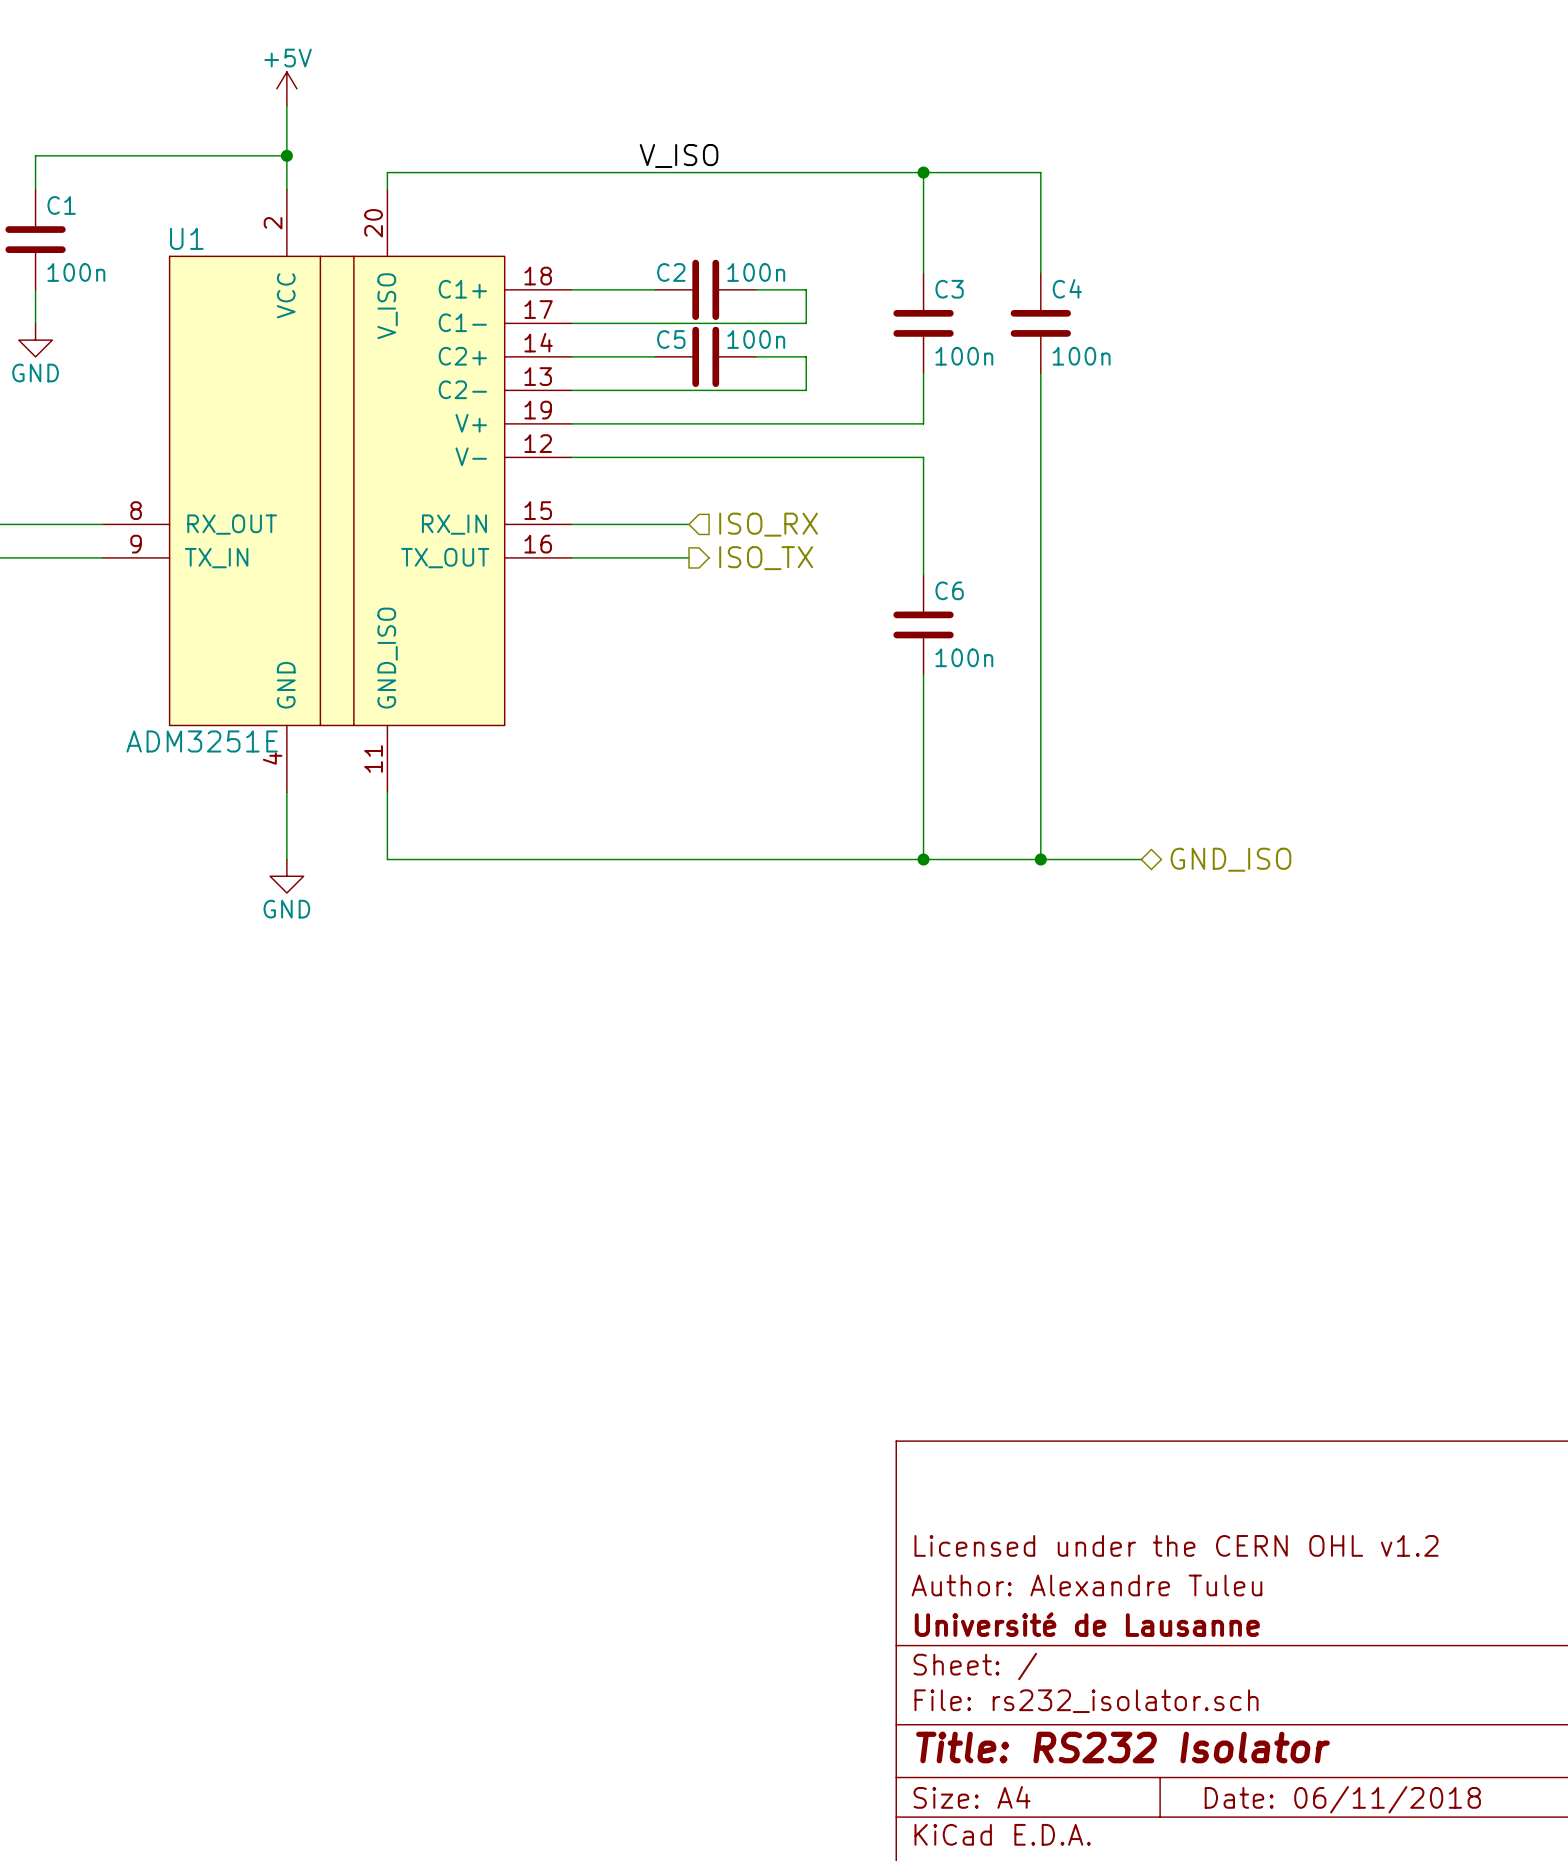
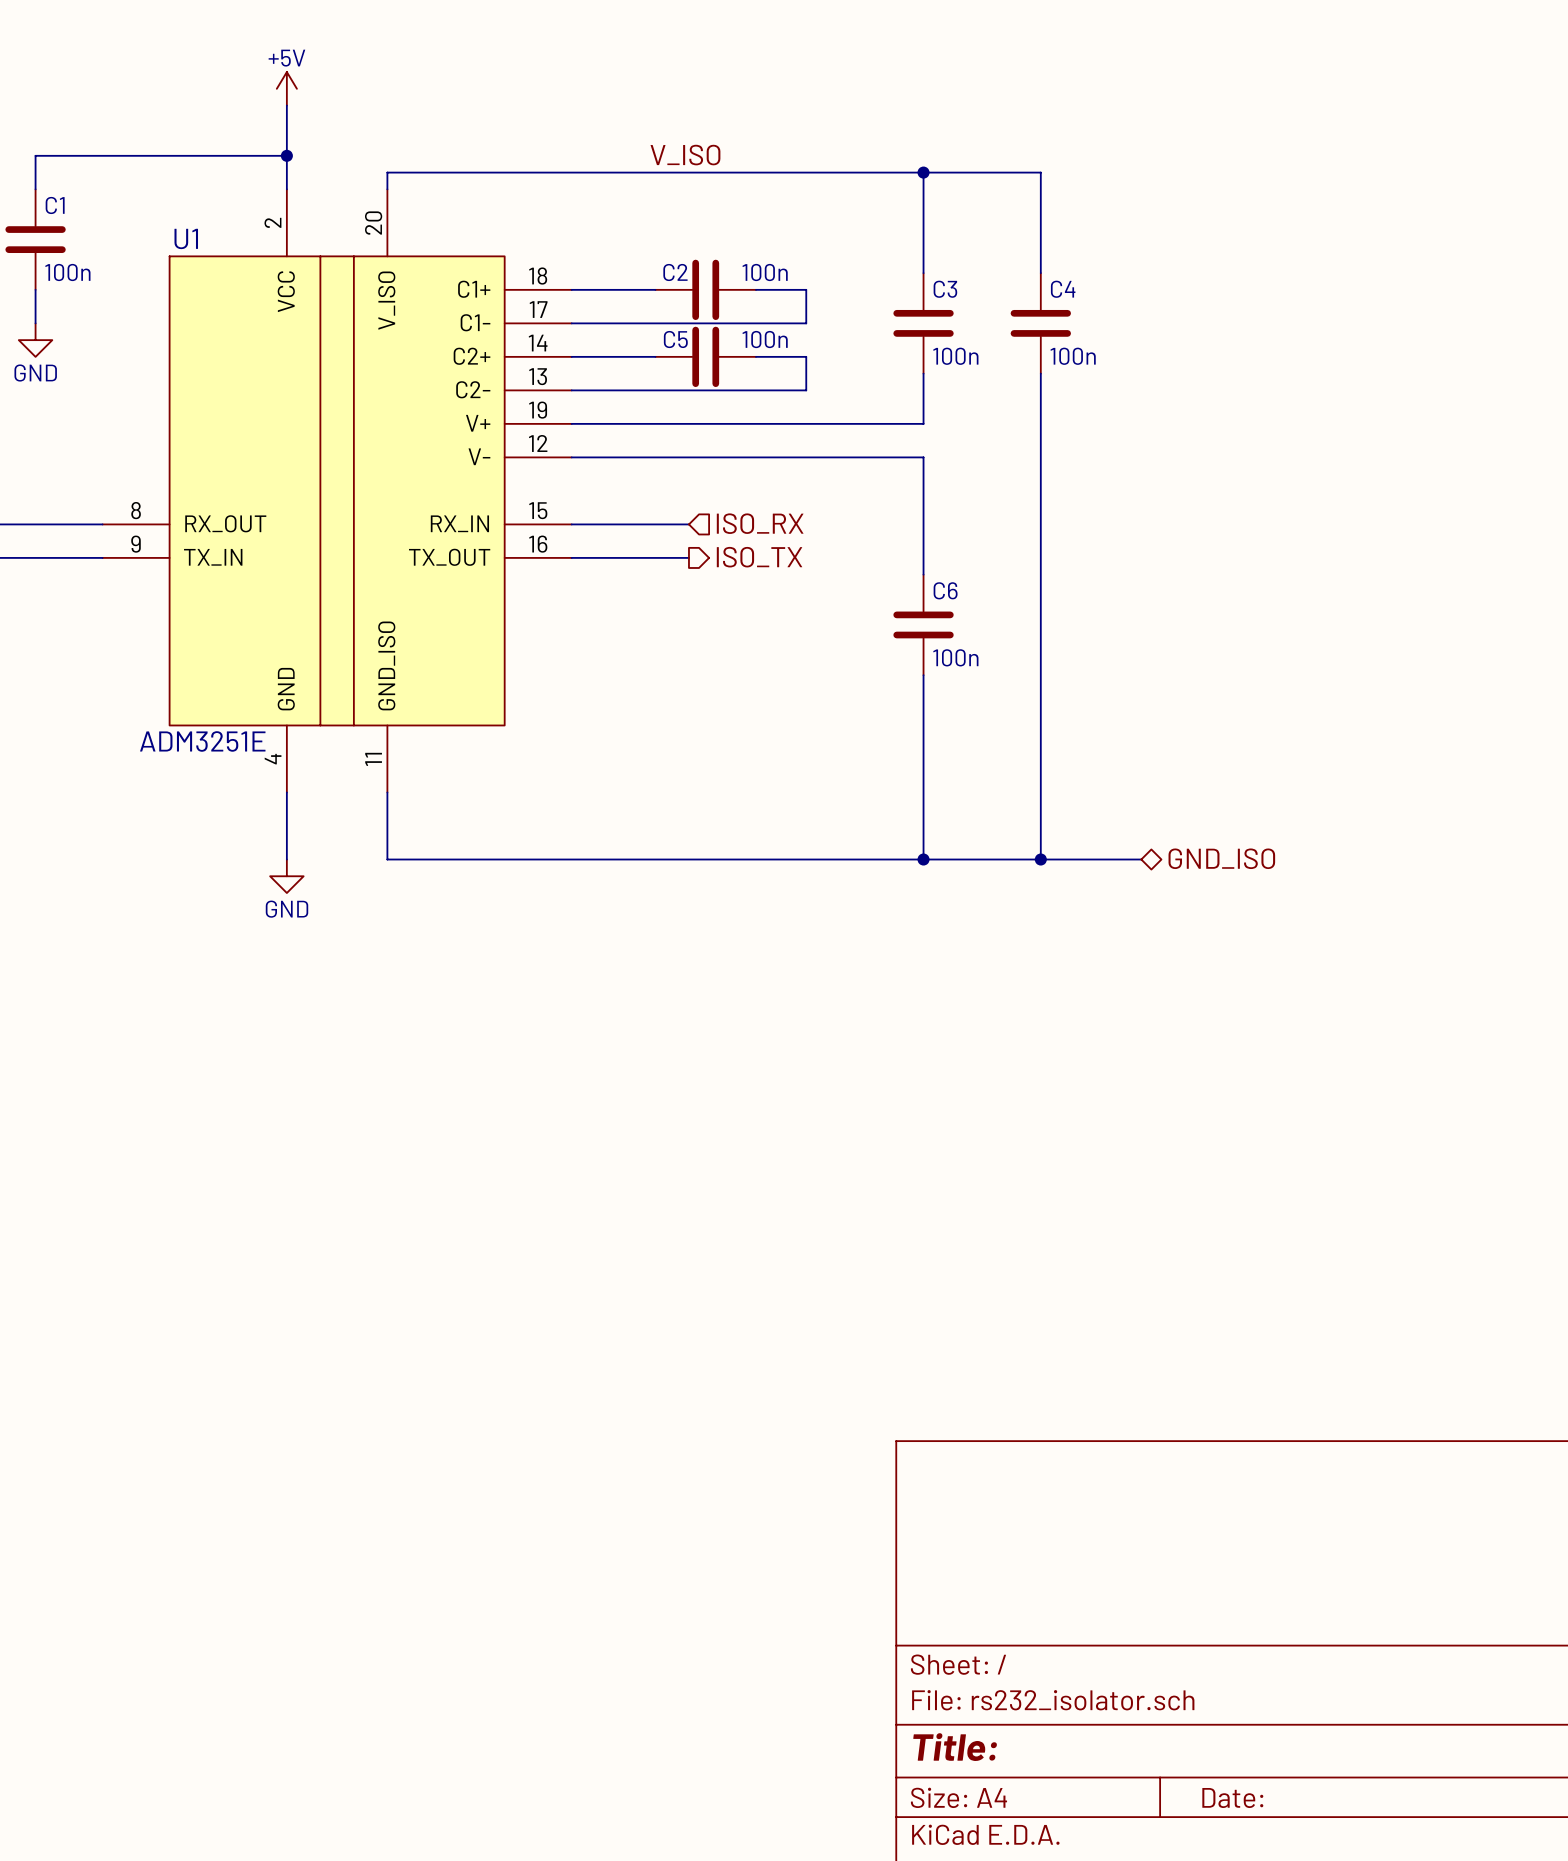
title block: Licensed under the CERN OHL v1.2 (1176, 1545) -> none
title block: Author: Alexandre Tuleu (1086, 1585) -> none
title block: Université de Lausanne (1087, 1624) -> none
title block: Title: RS232 Isolator (1122, 1747) -> Title: (955, 1747)
title block: Date: 06/11/2018 (1342, 1799) -> Date: (1232, 1798)

